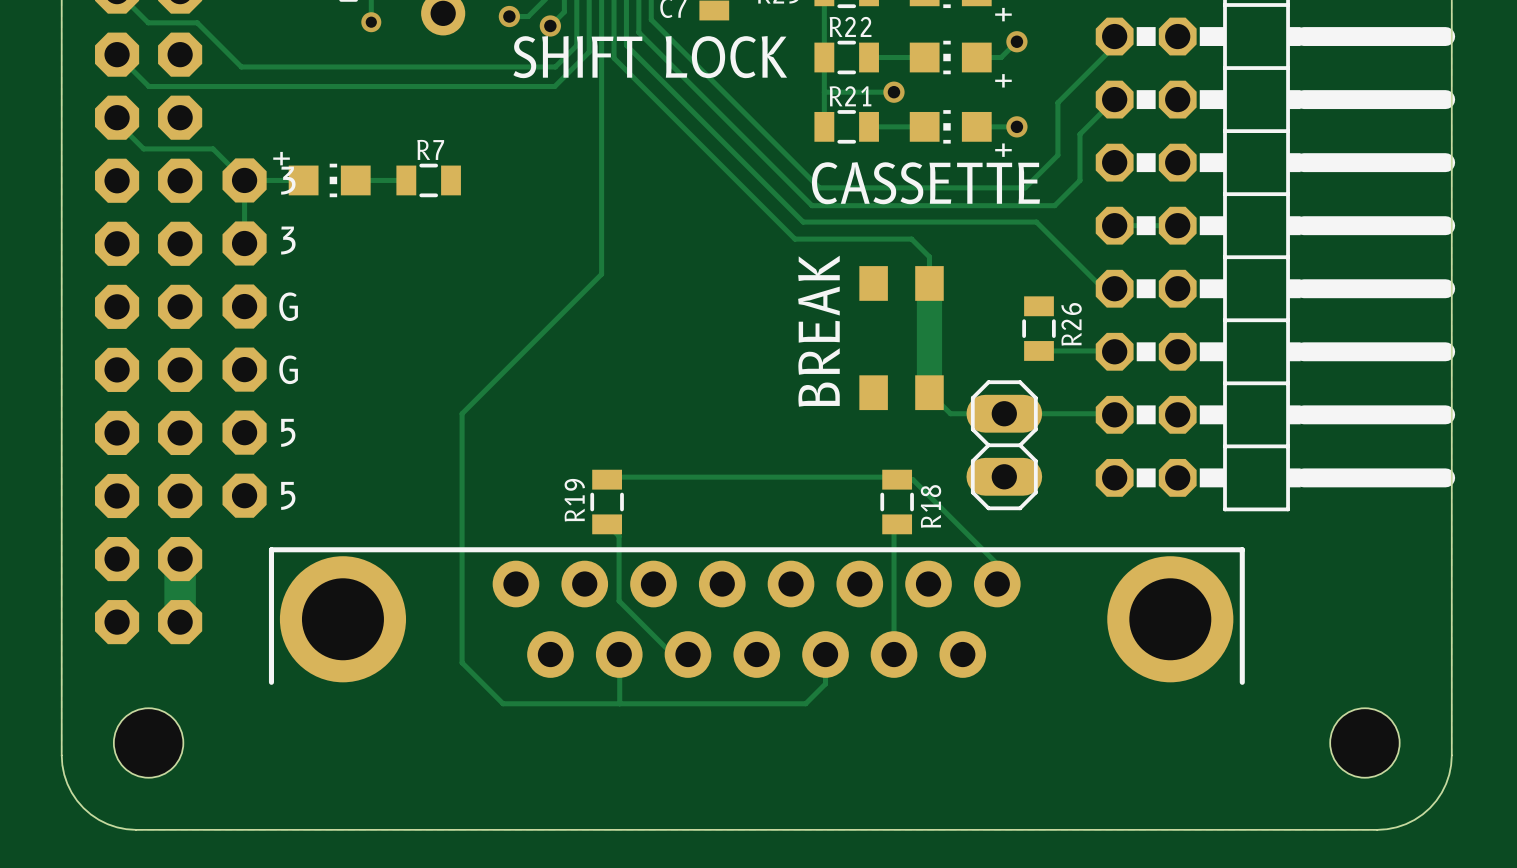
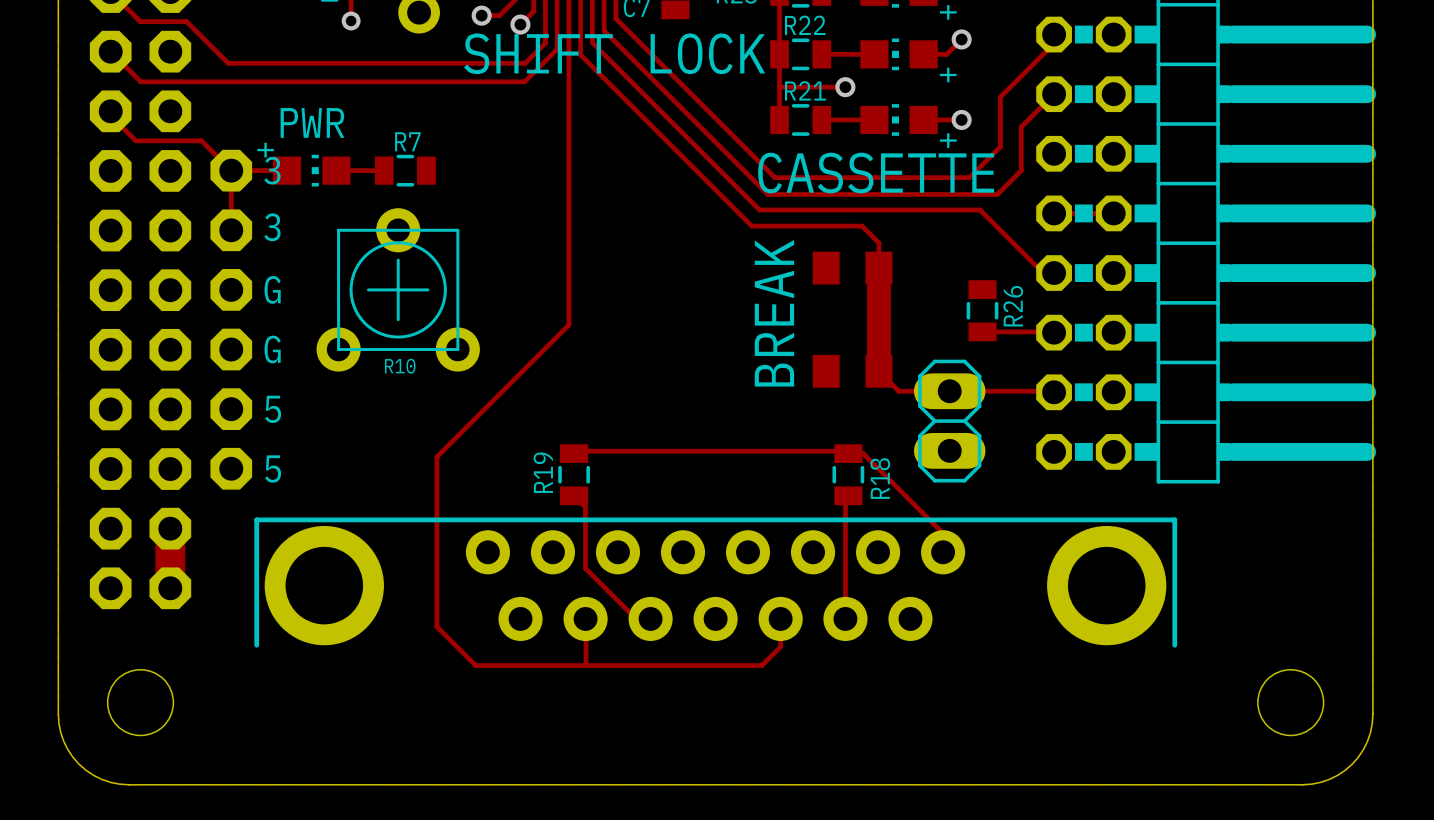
text: none -> PWR (312, 122)
track: (601, 274) (462, 413) (462, 483) -> (568, 259) (568, 324) (436, 456)
R10: none -> (398, 289)

